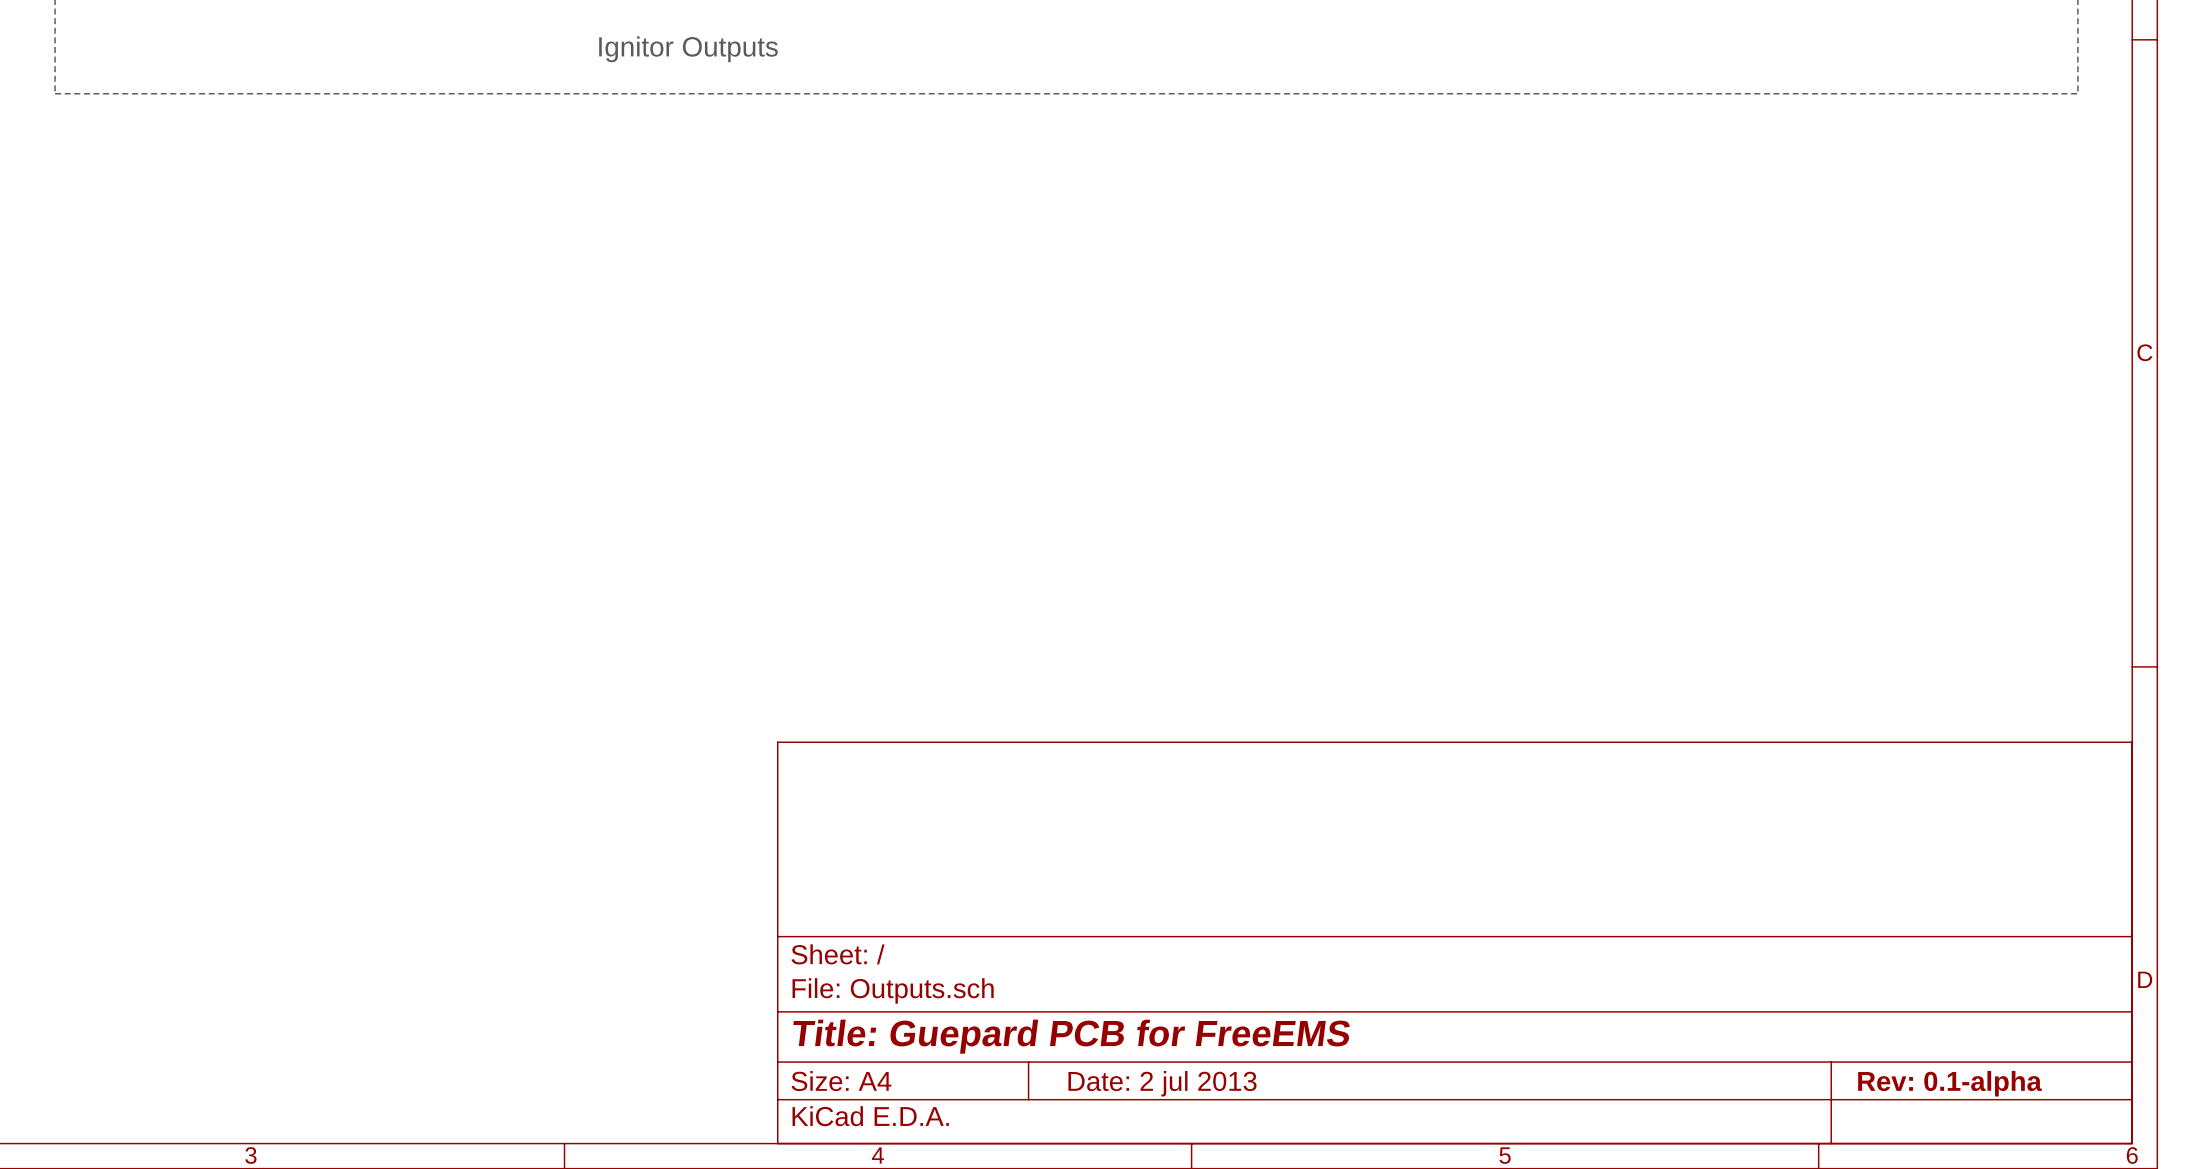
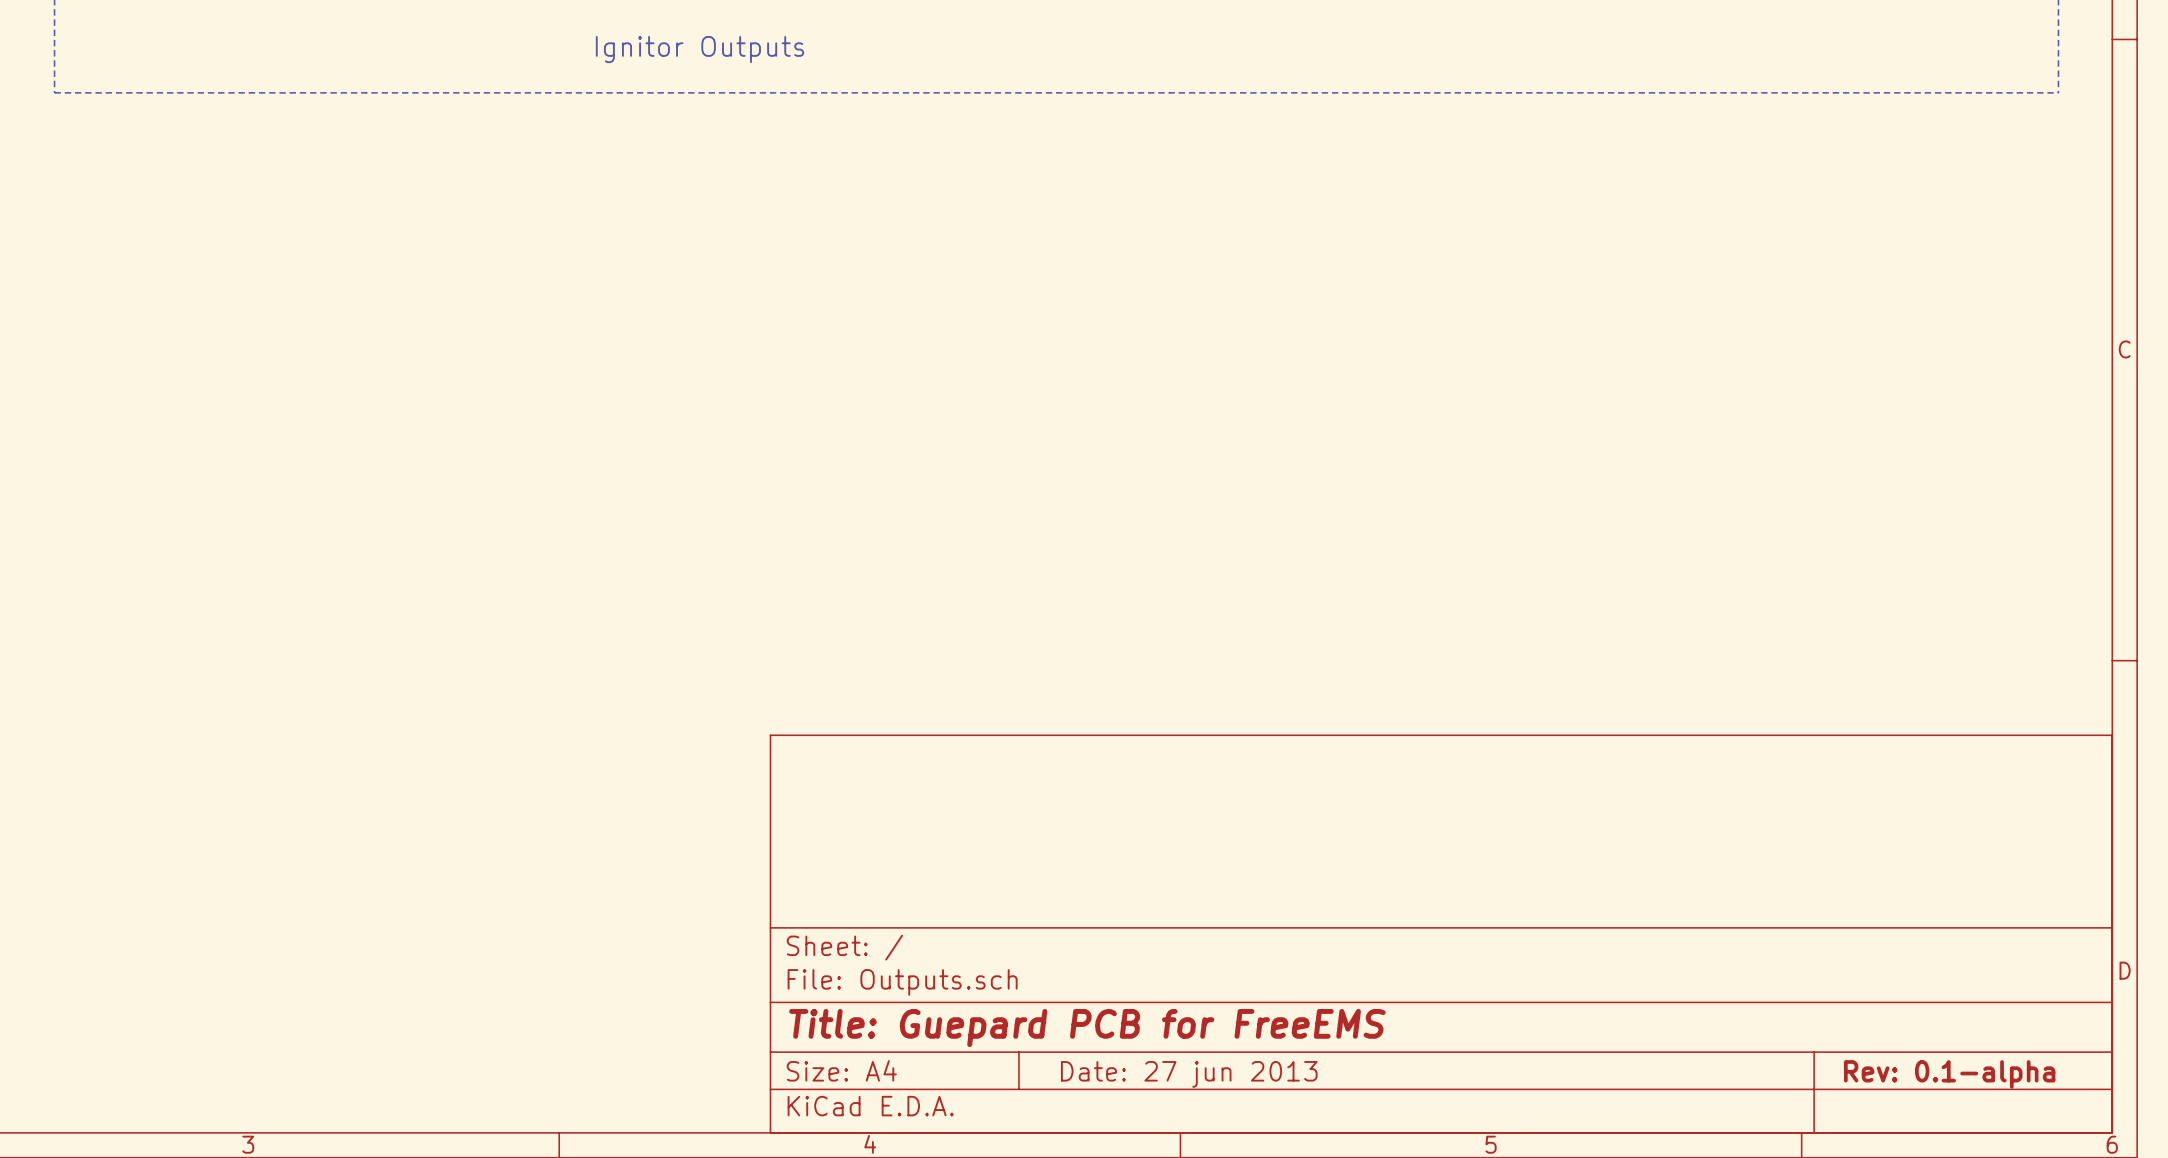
title block: Date: 2 jul 2013 (1162, 1083) -> Date: 27 jun 2013 (1189, 1074)

